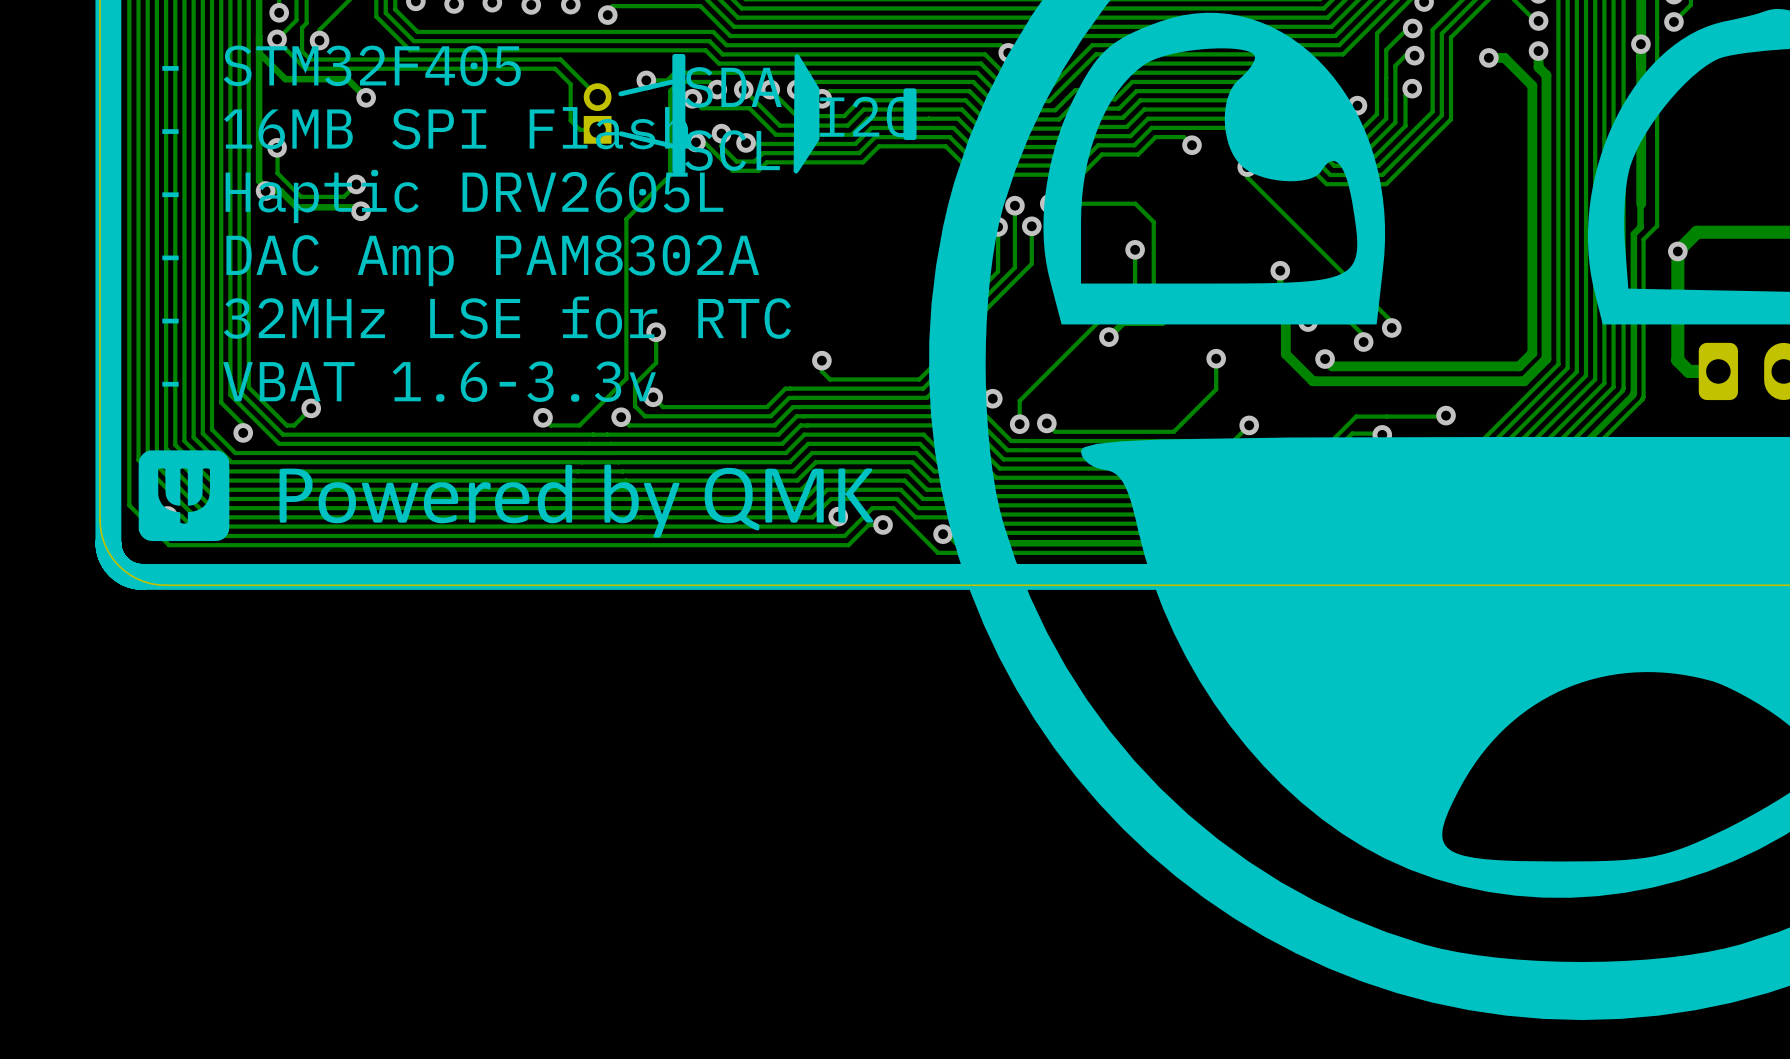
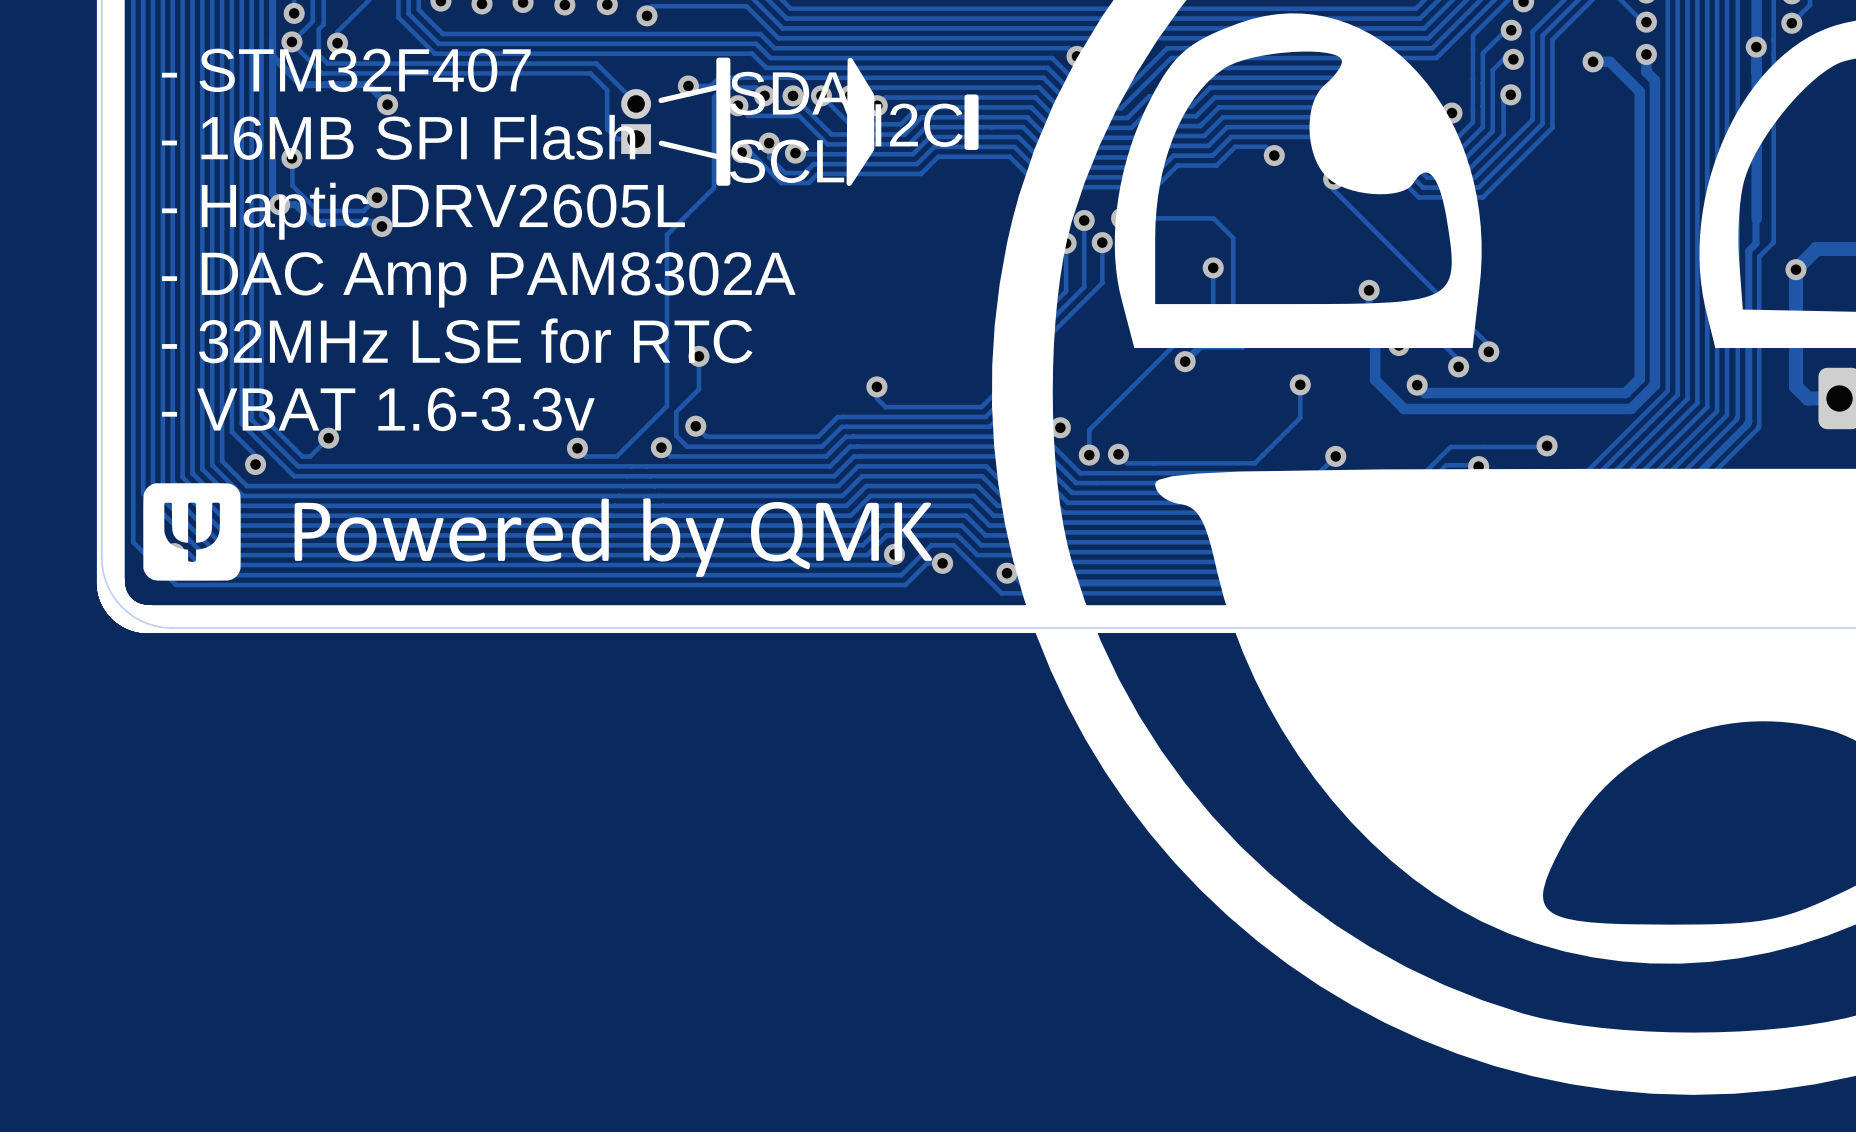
text: - STM32F405 (341, 65) -> - STM32F407 (346, 70)

